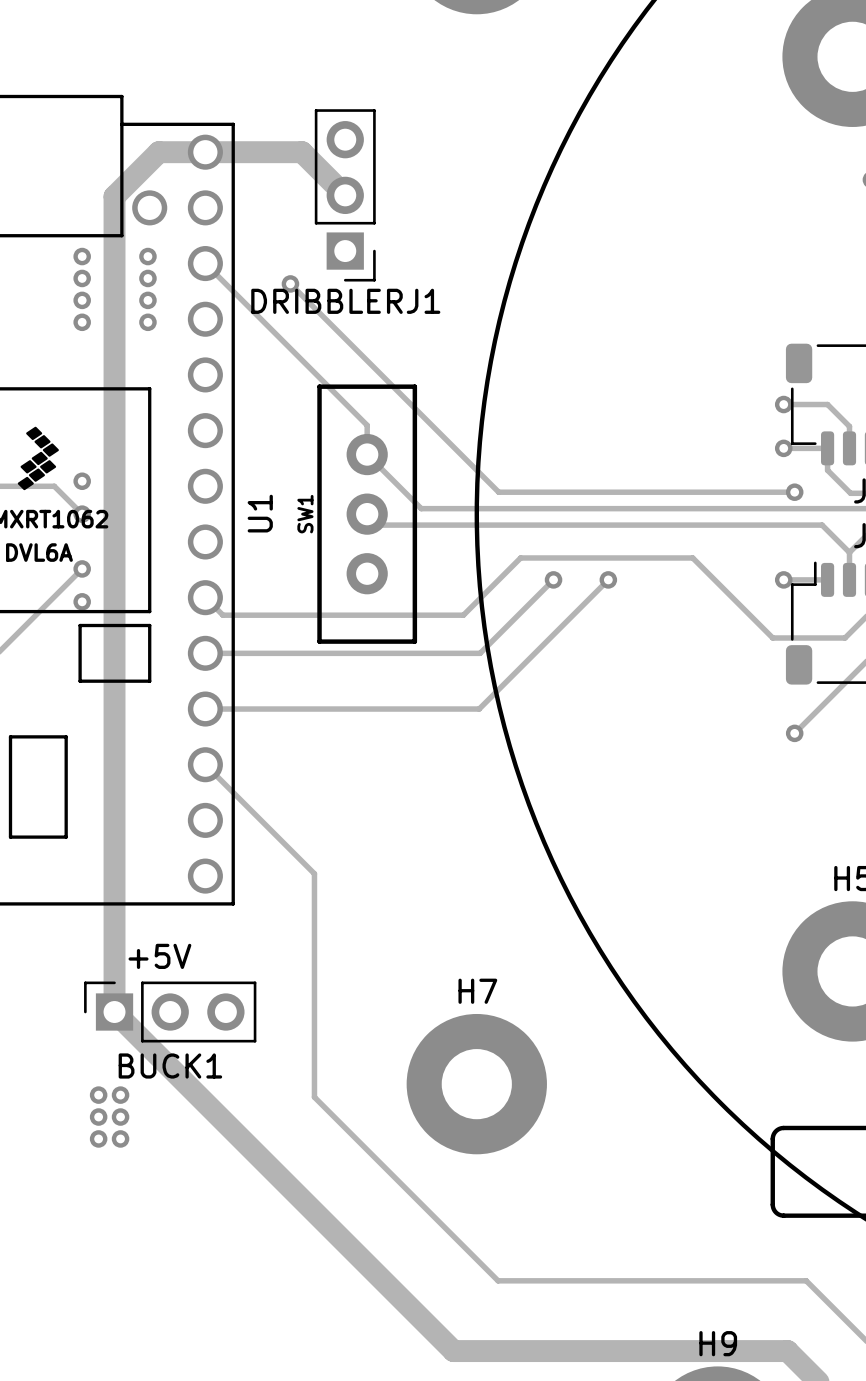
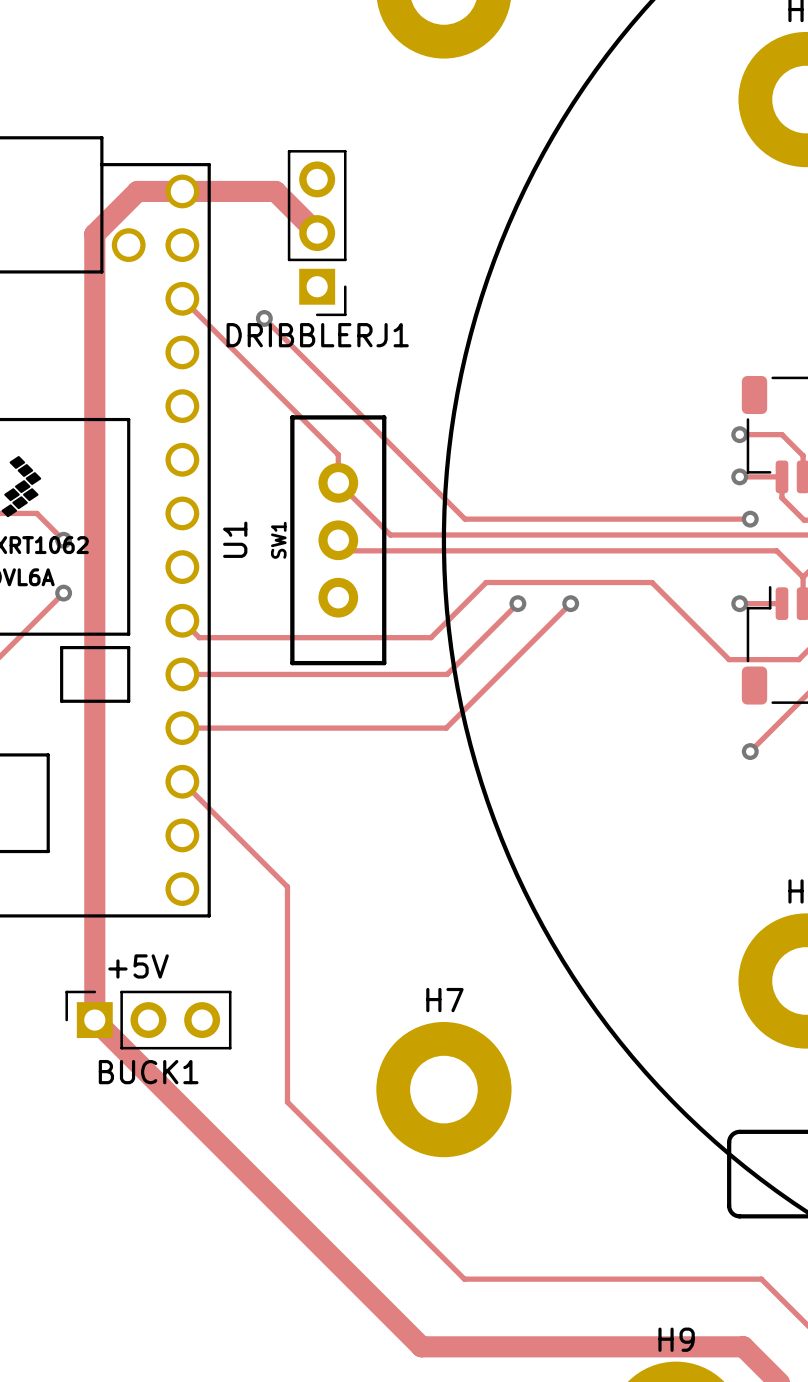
via: (82, 256) -> none
via: (147, 256) -> none
via: (82, 278) -> none
via: (147, 278) -> none
via: (82, 300) -> none
via: (147, 300) -> none
via: (82, 322) -> none
via: (147, 322) -> none
via: (82, 481) -> none
via: (82, 601) -> none
via: (98, 1095) -> none
via: (120, 1095) -> none
via: (98, 1117) -> none
via: (120, 1117) -> none
via: (98, 1138) -> none
via: (120, 1138) -> none

